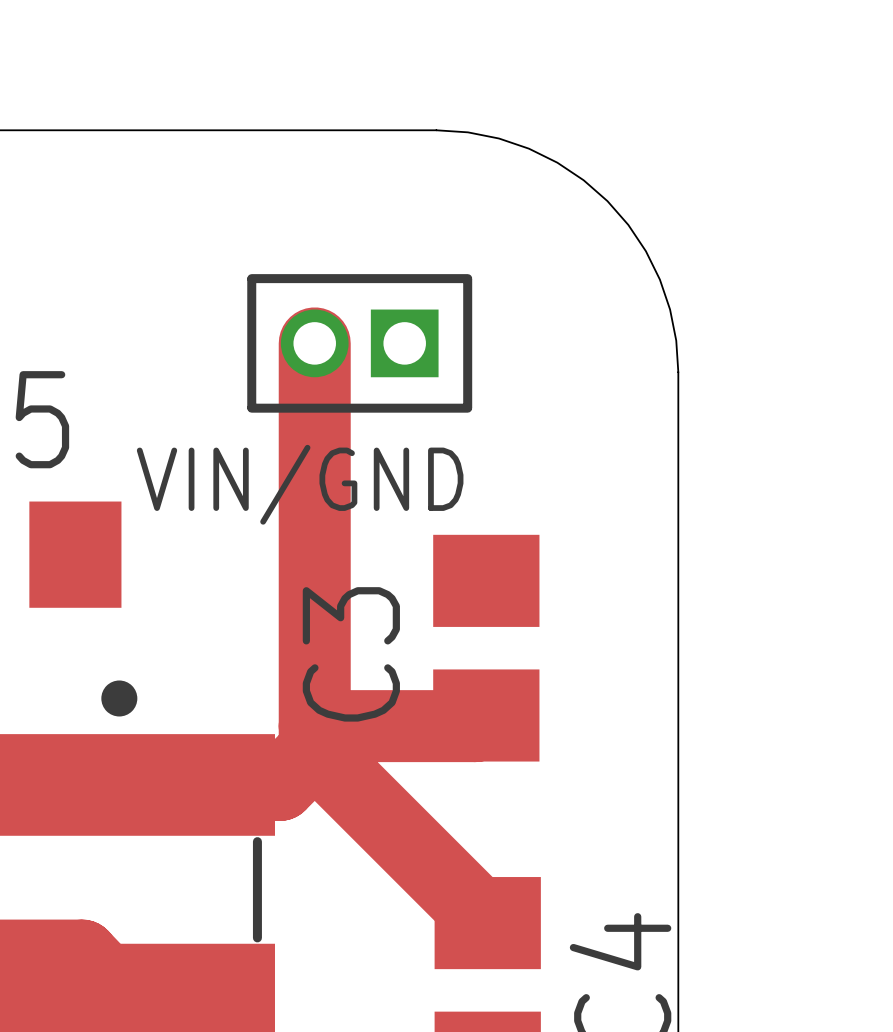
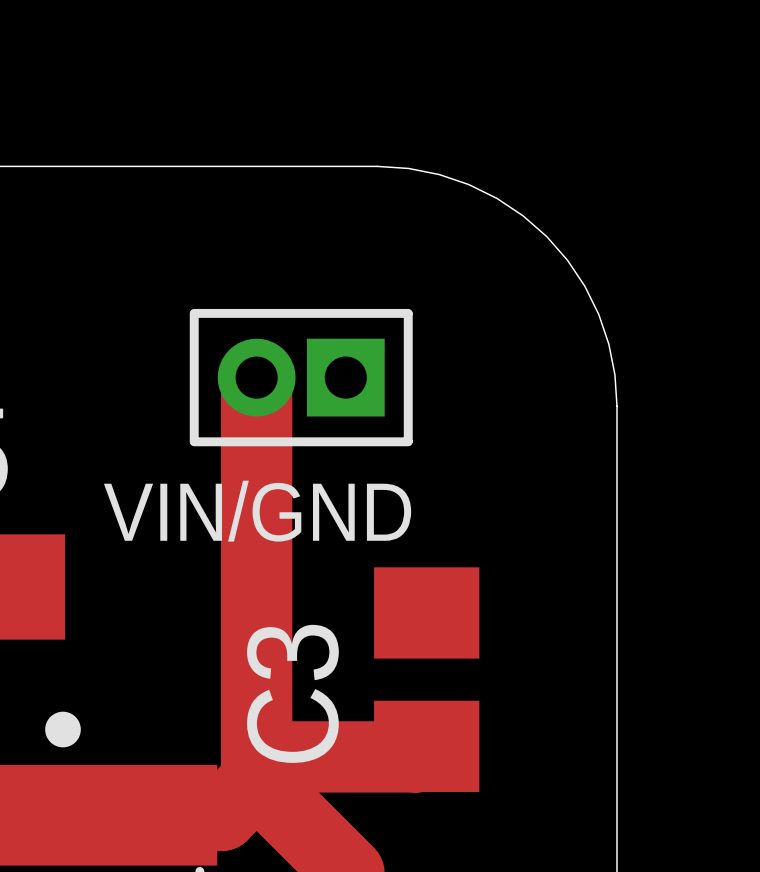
VIN/GND footprint: [247, 274, 473, 413] -> [189, 308, 413, 447]

